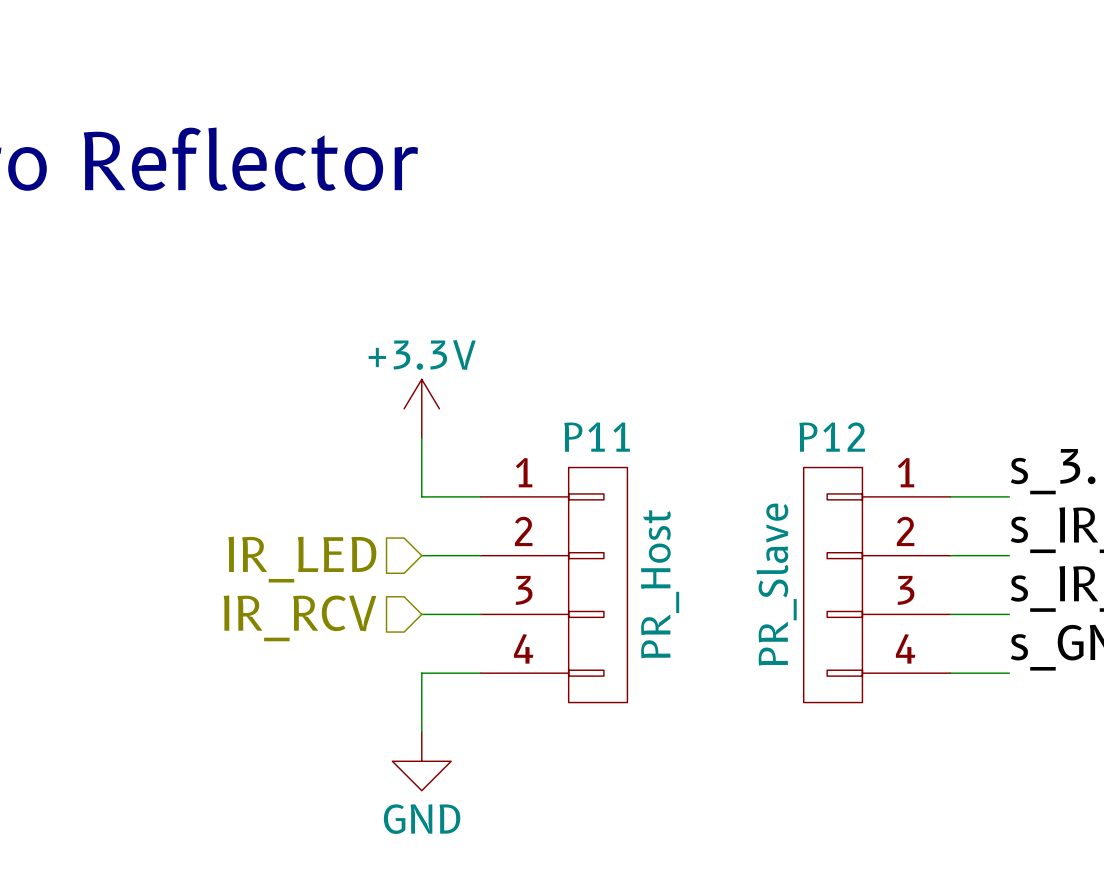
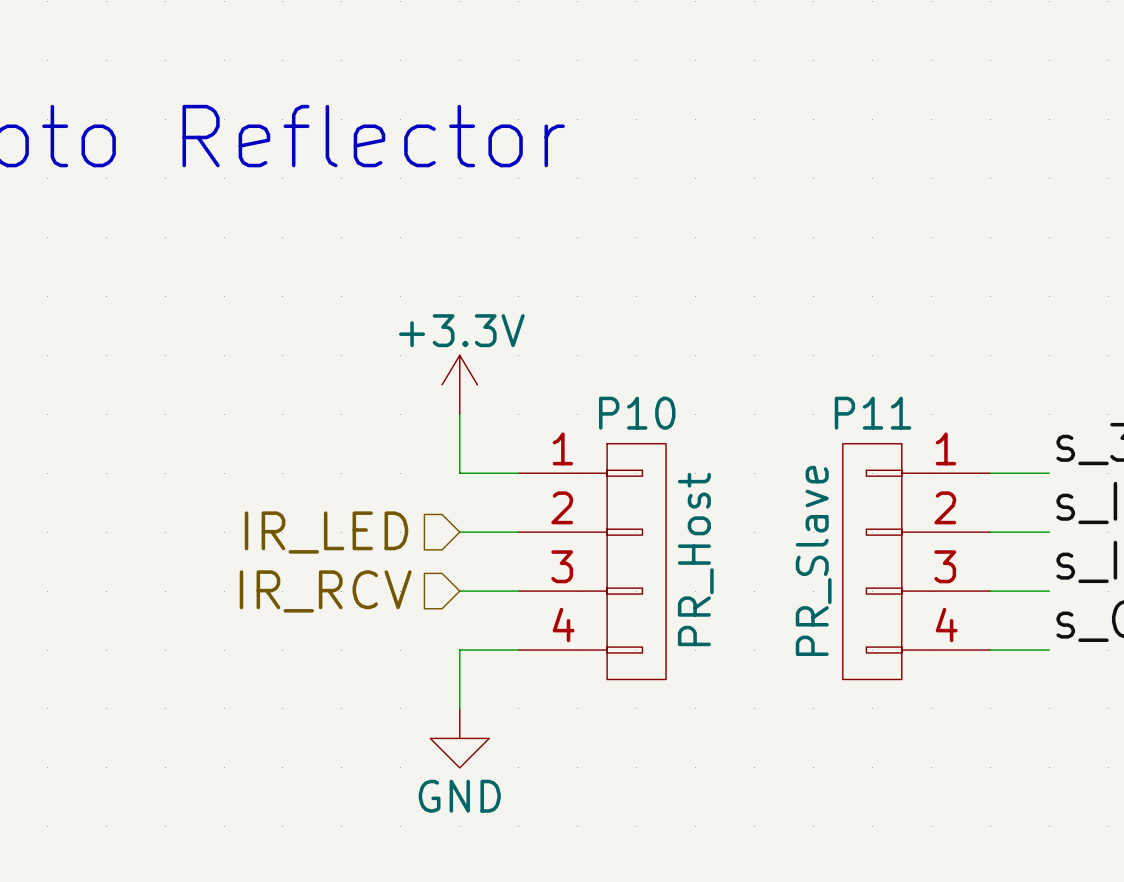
P11 name: P11 (597, 437) -> P10 (637, 413)
P12 name: P12 (832, 437) -> P11 (873, 413)

